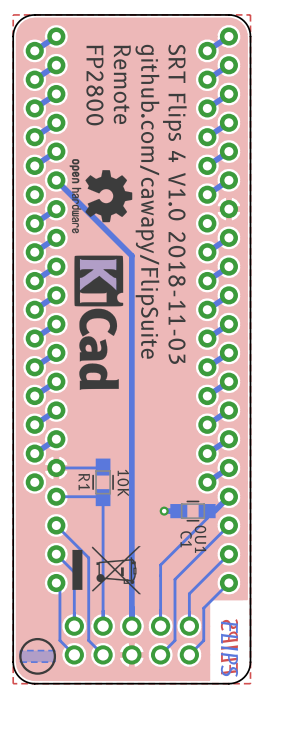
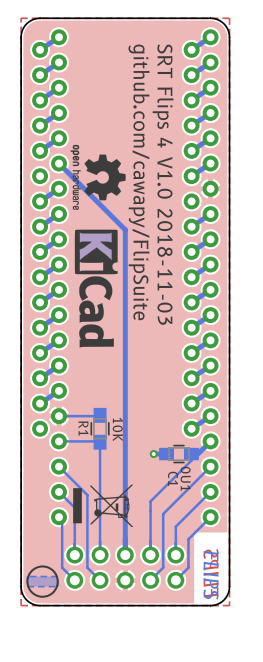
text: Remote (122, 84) -> none
text: FP2800 (94, 85) -> none

